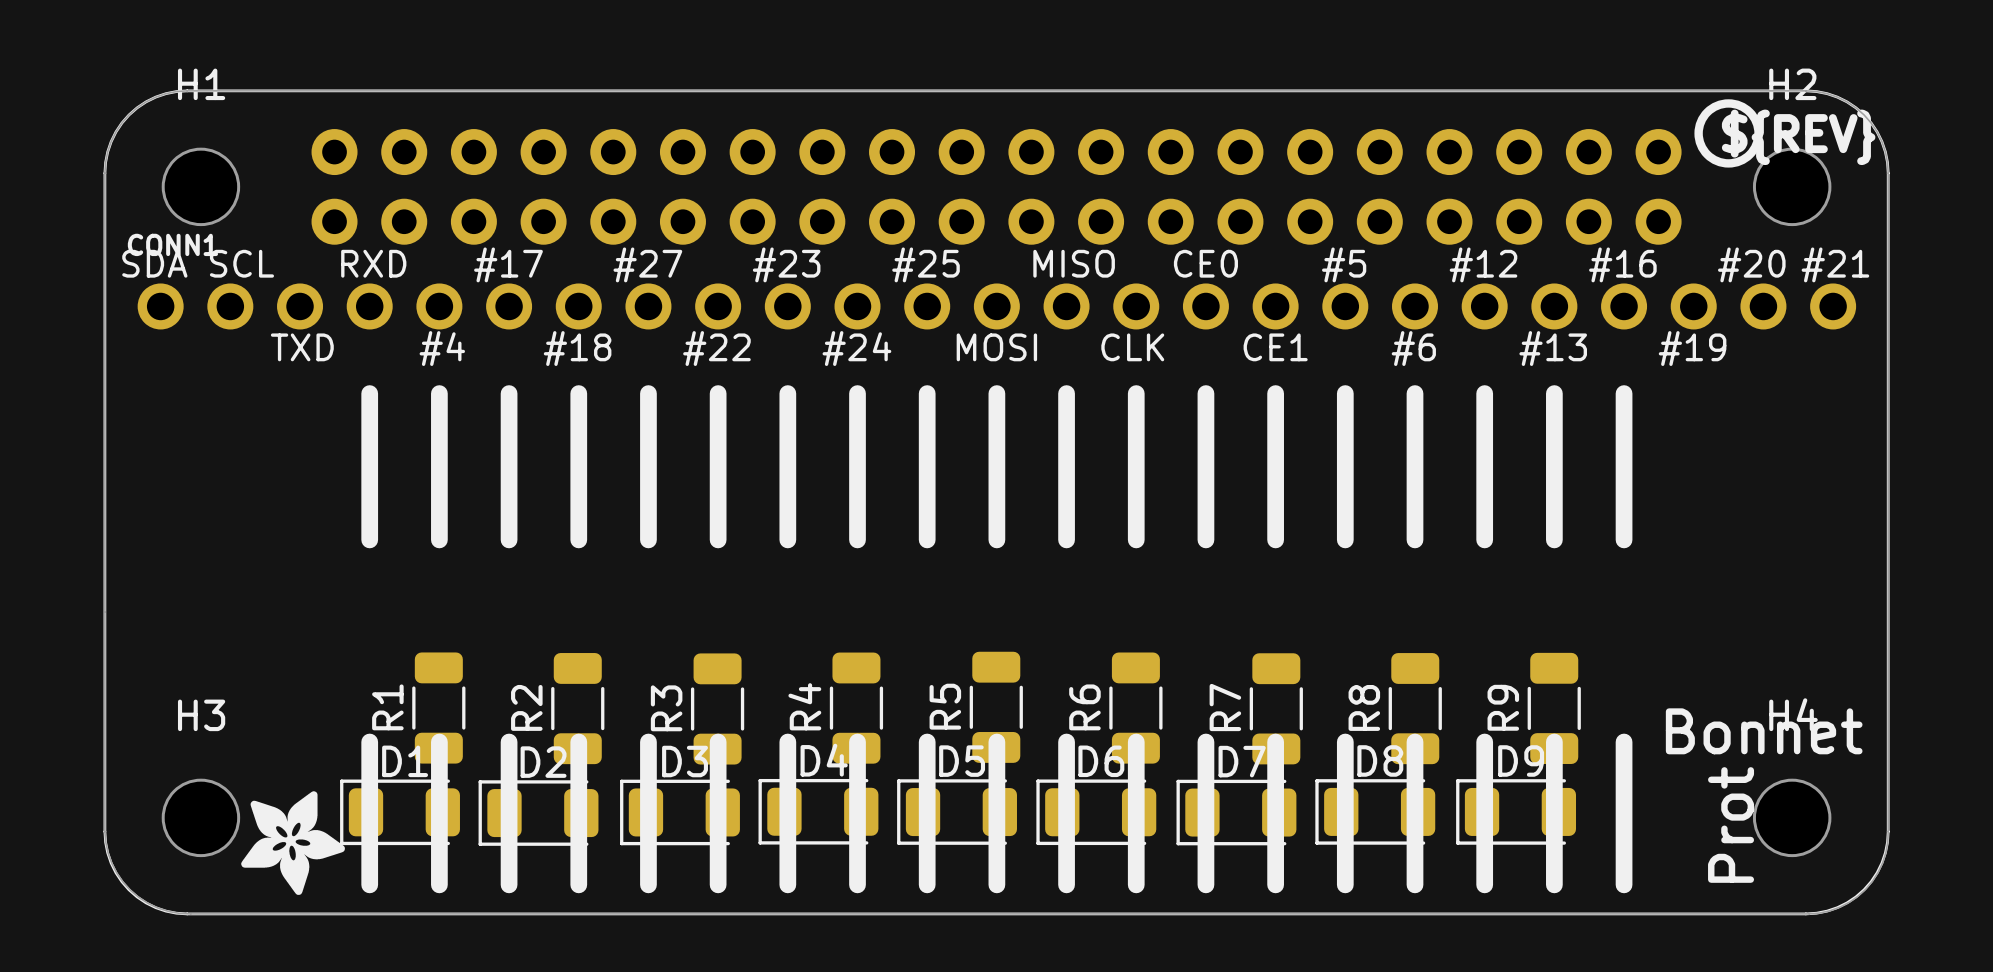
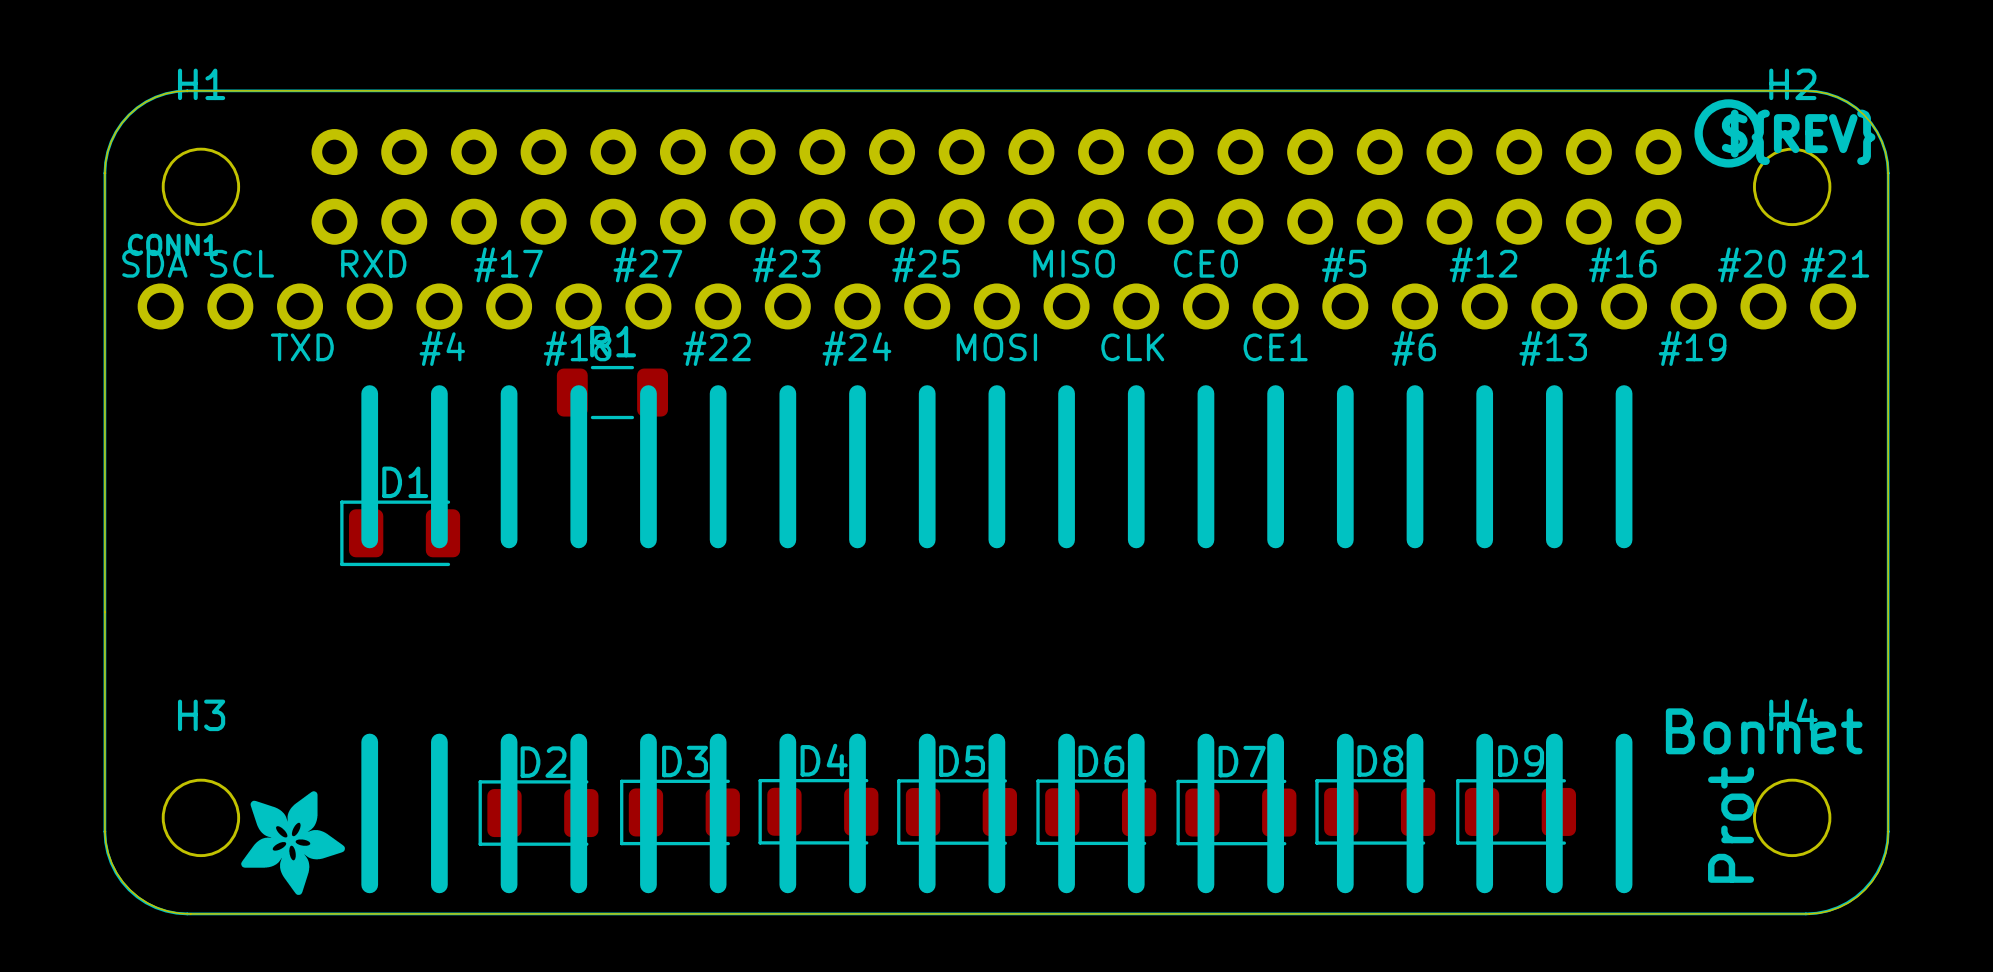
R5: (996, 707) -> none
R1 rotation: 0° (438, 708) -> 90° clockwise (612, 392)
R1 position: (438, 708) -> (612, 392)
R2: (577, 708) -> none
R3: (717, 708) -> none
R4: (856, 708) -> none
R6: (1135, 708) -> none
R7: (1276, 708) -> none
R8: (1415, 708) -> none
R9: (1554, 708) -> none
D1 position: (400, 812) -> (400, 533)

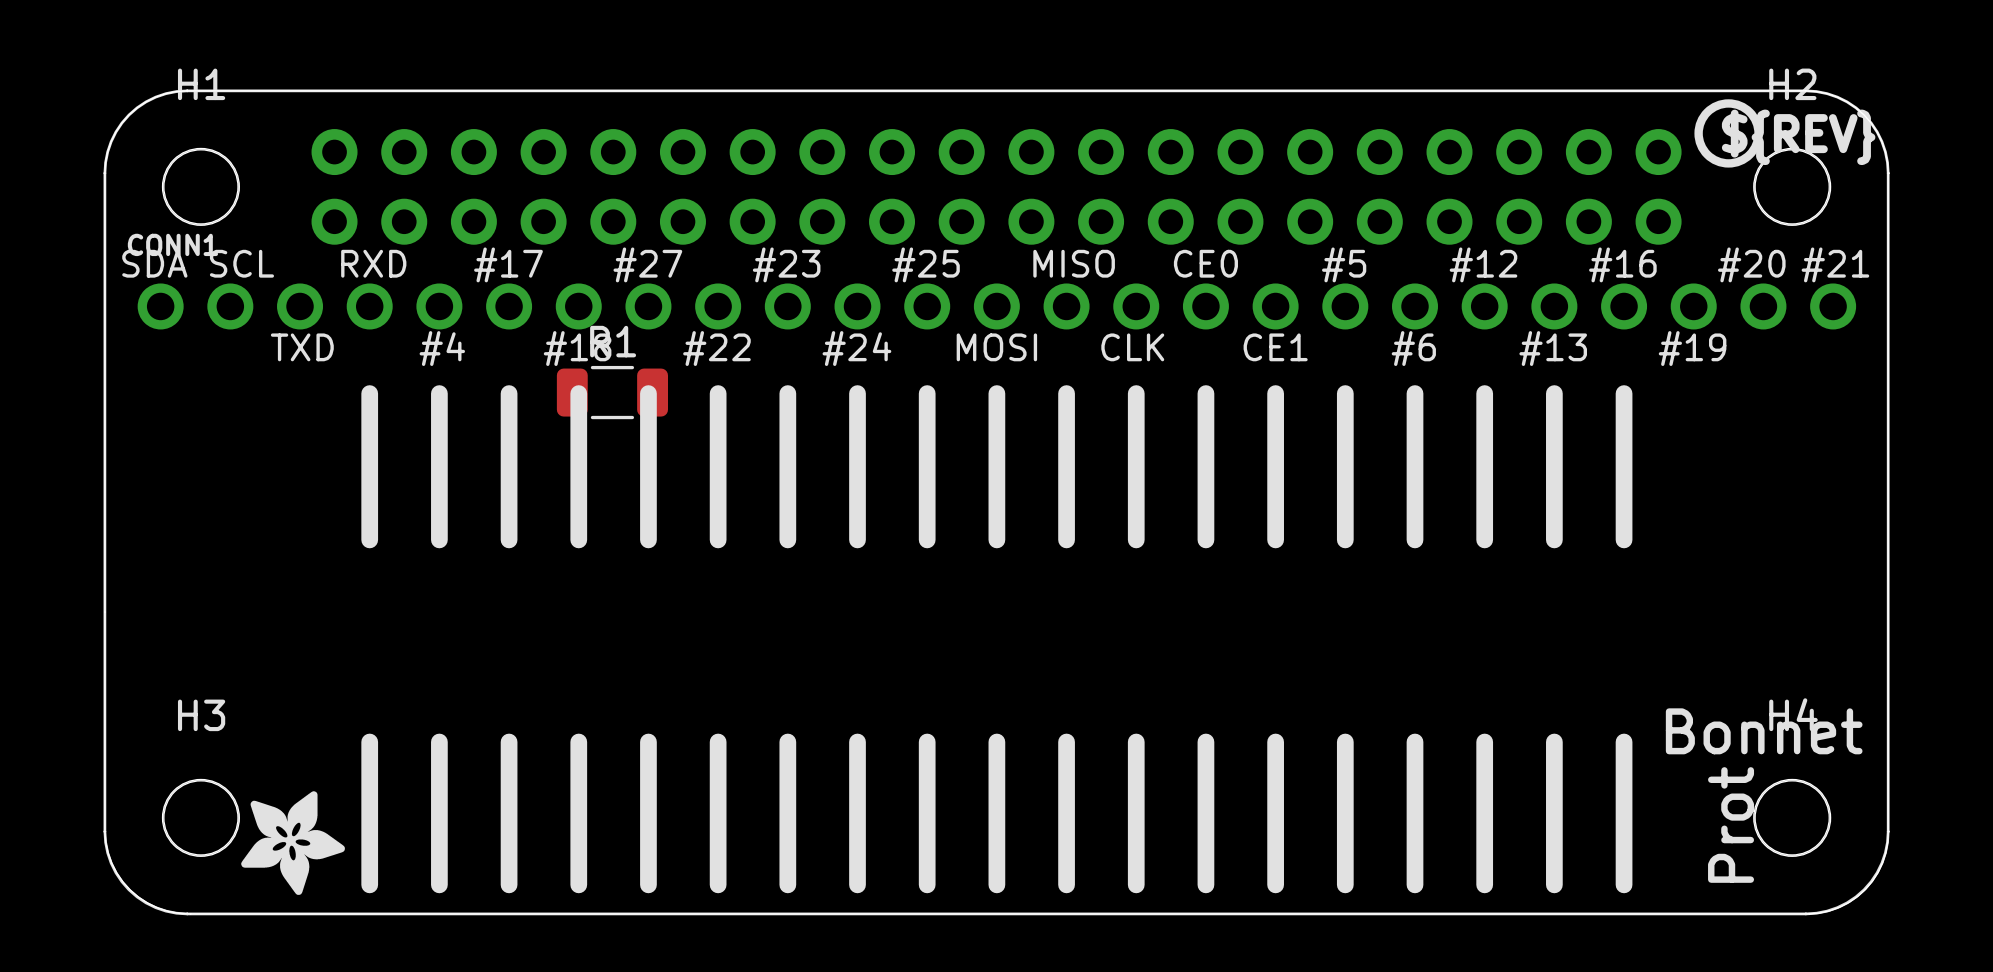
D1: (400, 533) -> none
D4: (818, 811) -> none
D8: (1375, 811) -> none
D9: (1516, 811) -> none
D3: (679, 812) -> none
D5: (957, 812) -> none
D6: (1096, 812) -> none
D7: (1236, 812) -> none
D2: (538, 813) -> none

